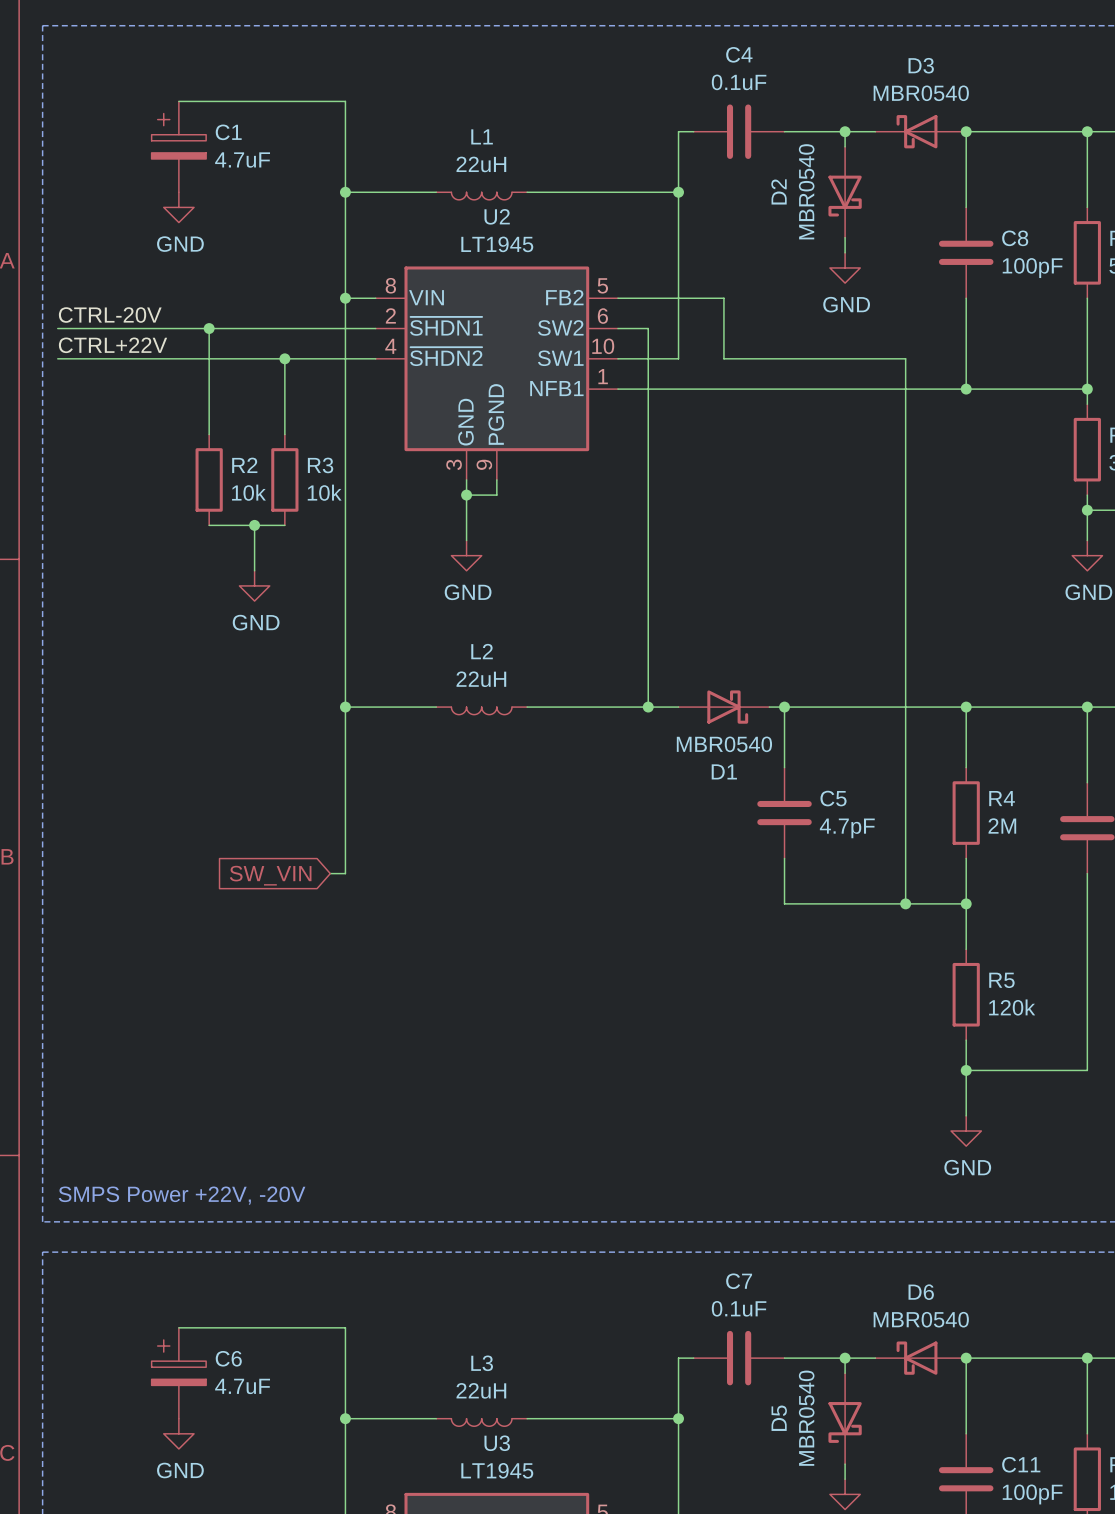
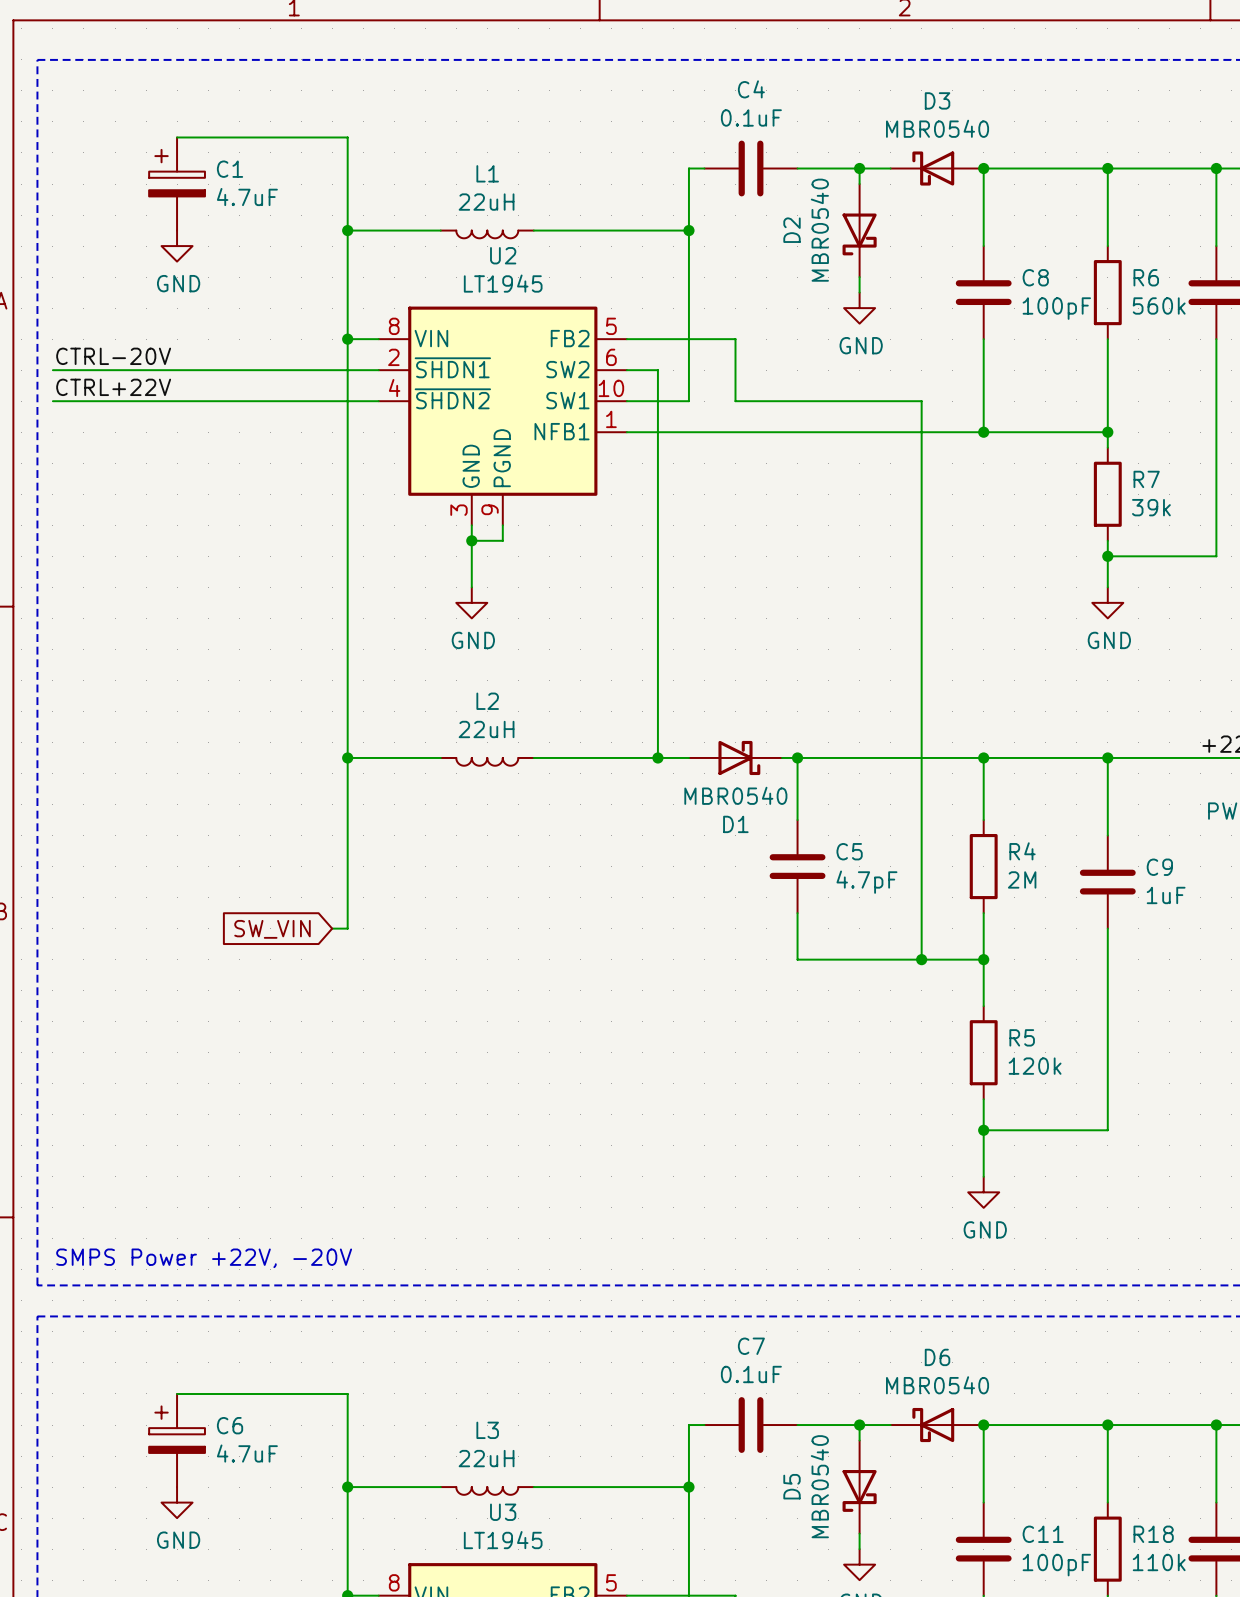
wire: (209, 328) (209, 434) -> none
junction: (209, 328) -> none
wire: (284, 358) (284, 434) -> none
junction: (284, 358) -> none
R2: 10k (209, 479) -> none
R3: 10k (284, 479) -> none
wire: (209, 525) (284, 525) -> none
wire: (254, 525) (254, 570) -> none
junction: (254, 525) -> none
power symbol: GND (254, 585) -> none

